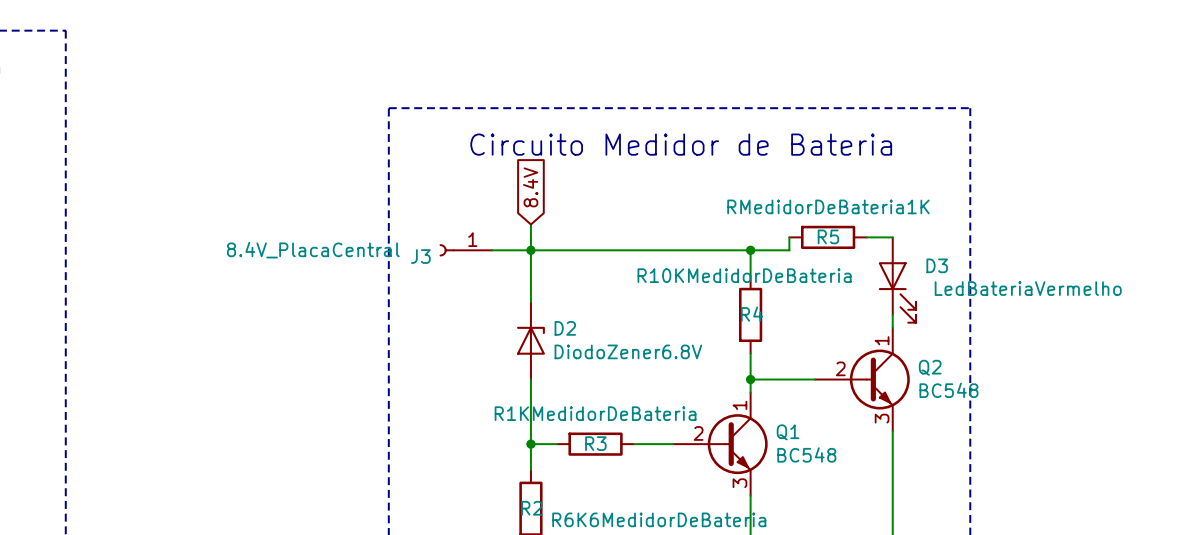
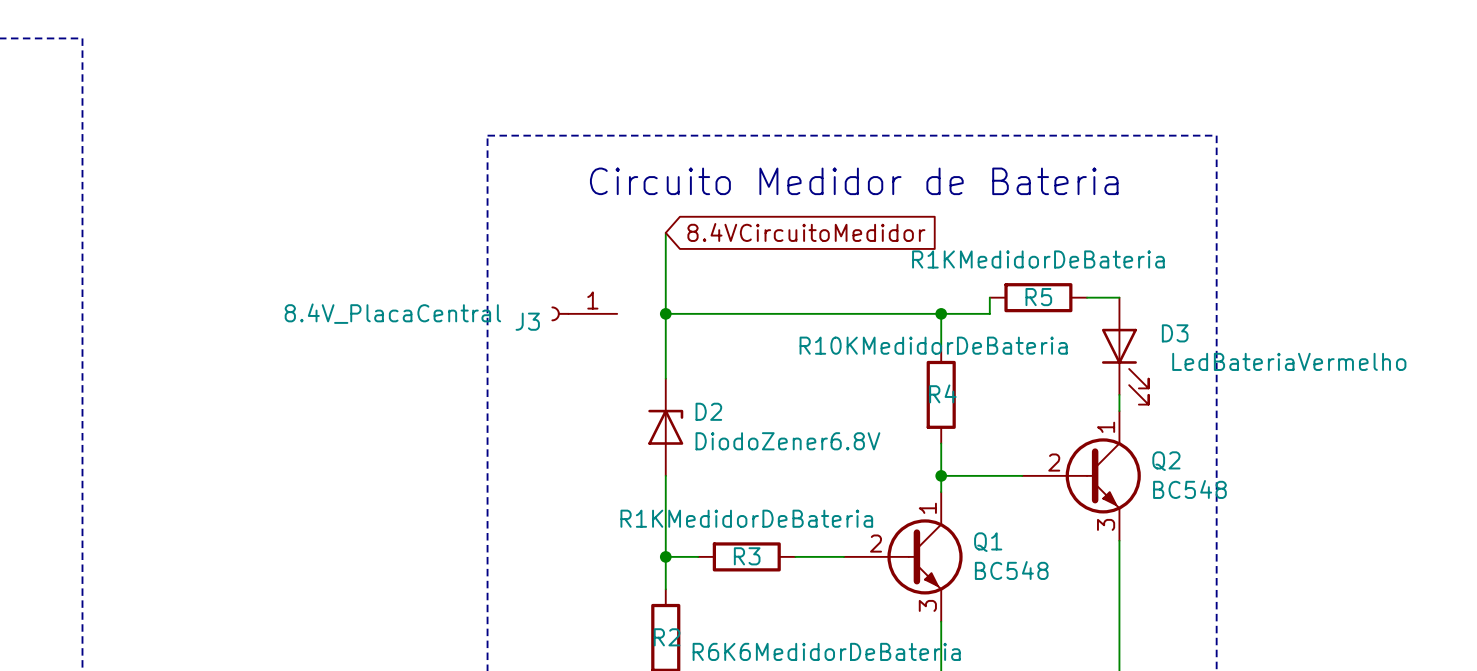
wire: none -> (665, 232) (665, 281)
global label: none -> 8.4VCircuitoMedidor (806, 232)
global label: 8.4V (530, 187) -> none
R5 value: RMedidorDeBateria1K (828, 206) -> R1KMedidorDeBateria (1038, 259)
wire: (492, 250) (530, 250) -> none

